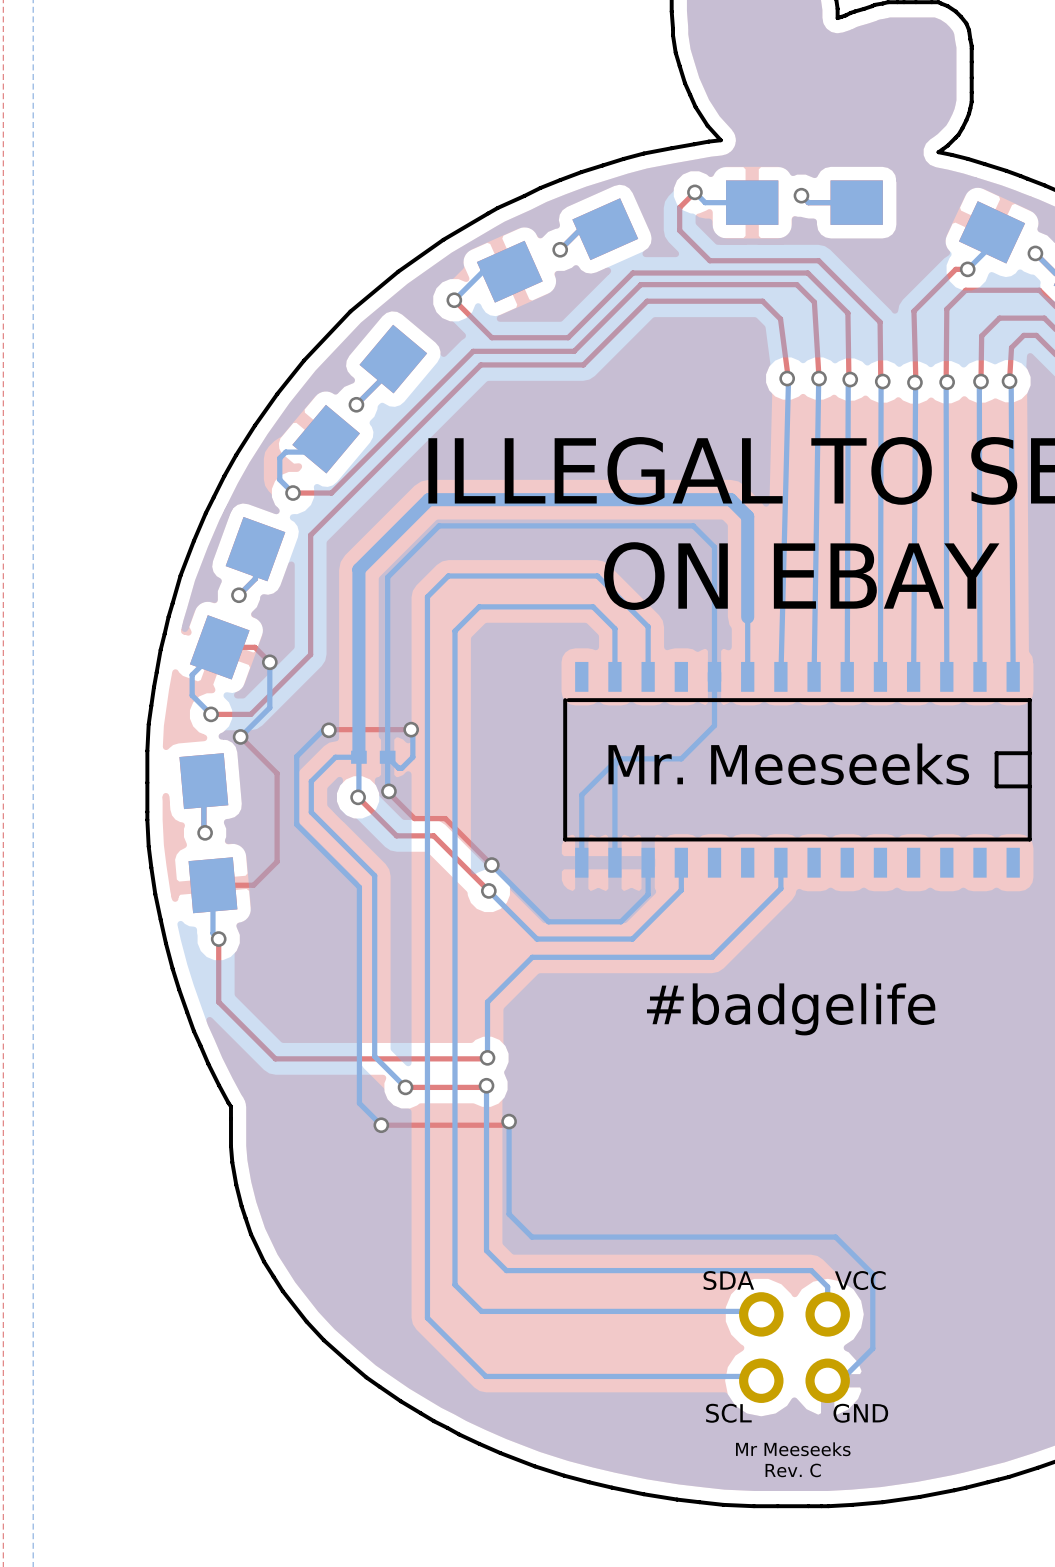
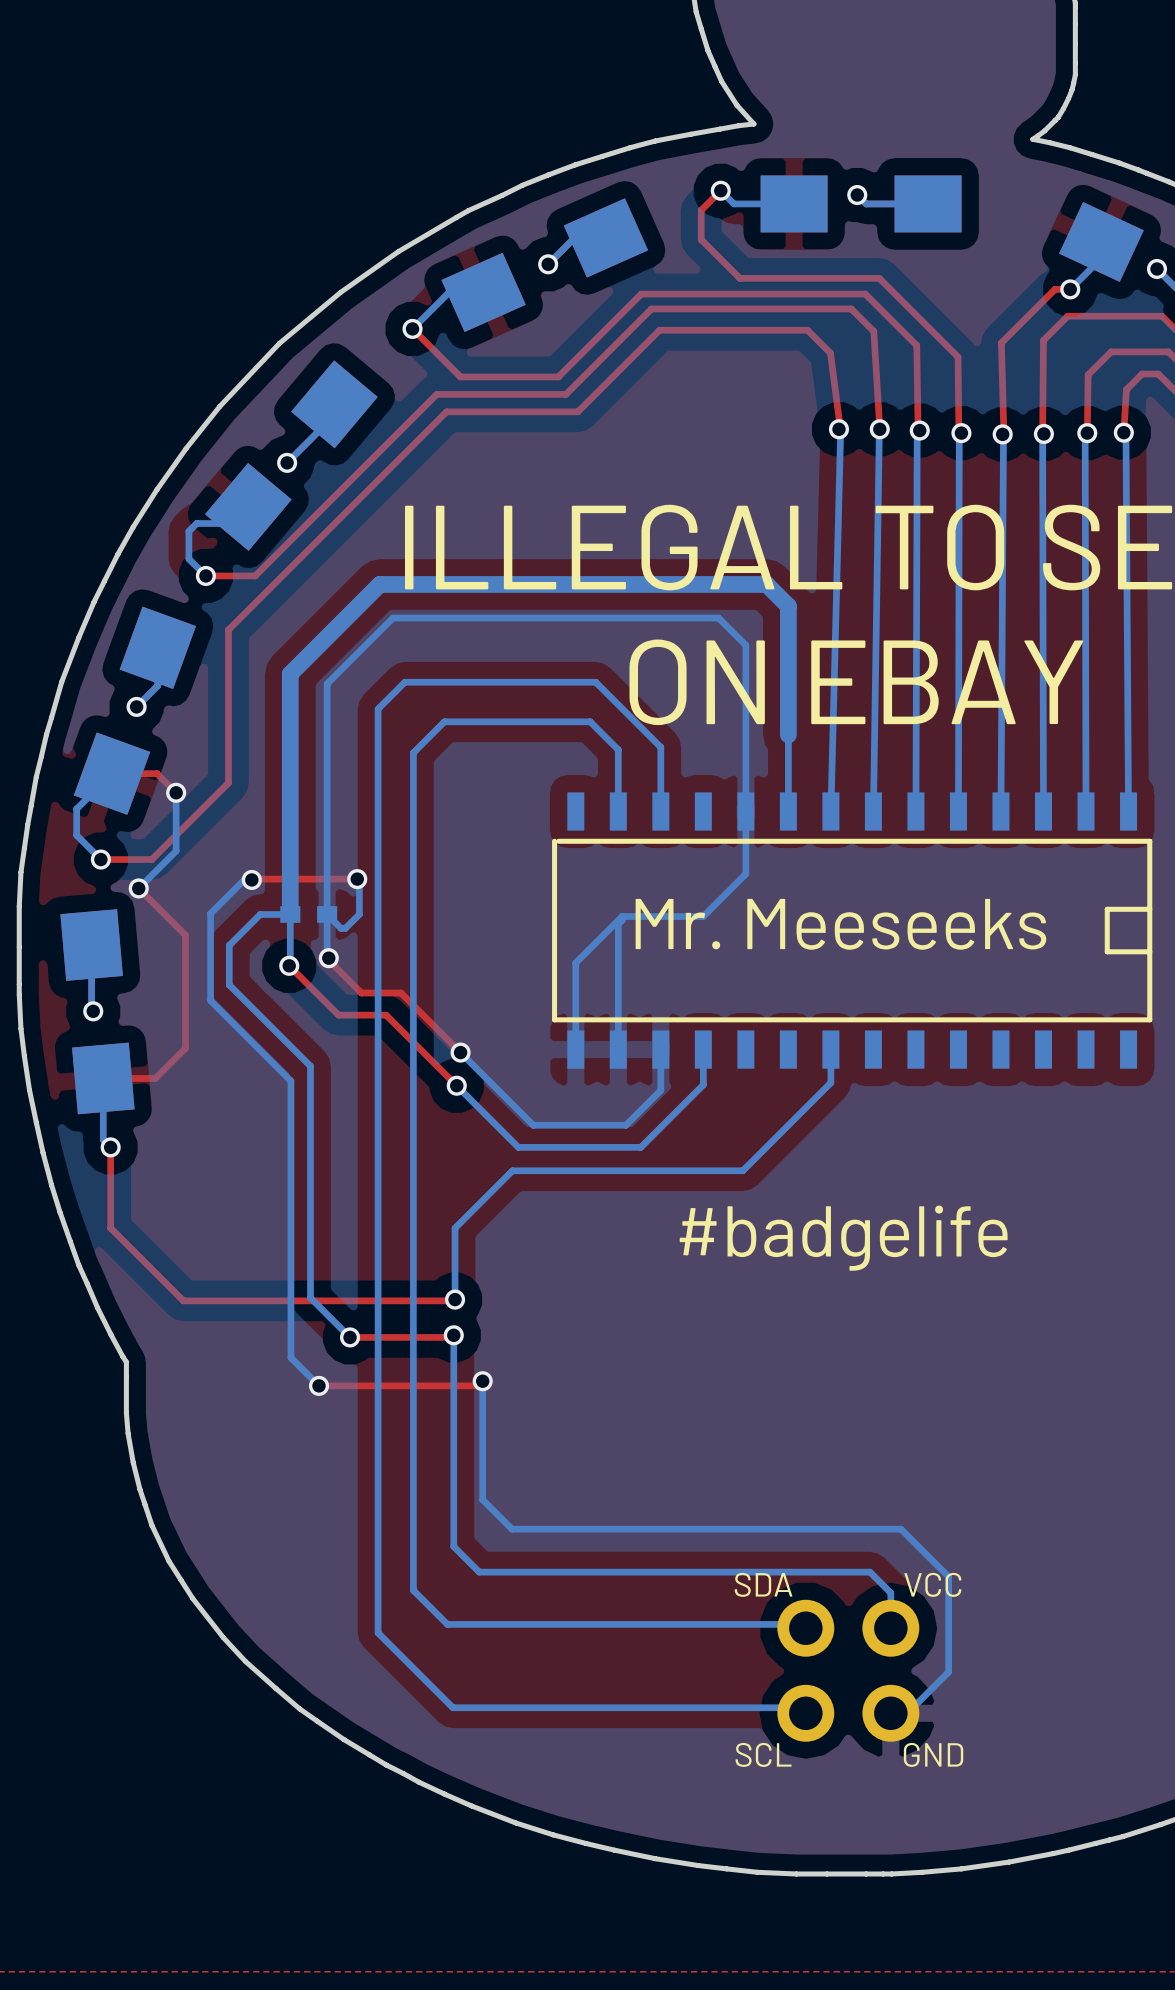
text: Mr Meeseeks (793, 1449) -> none
text: Rev. C (793, 1470) -> none

